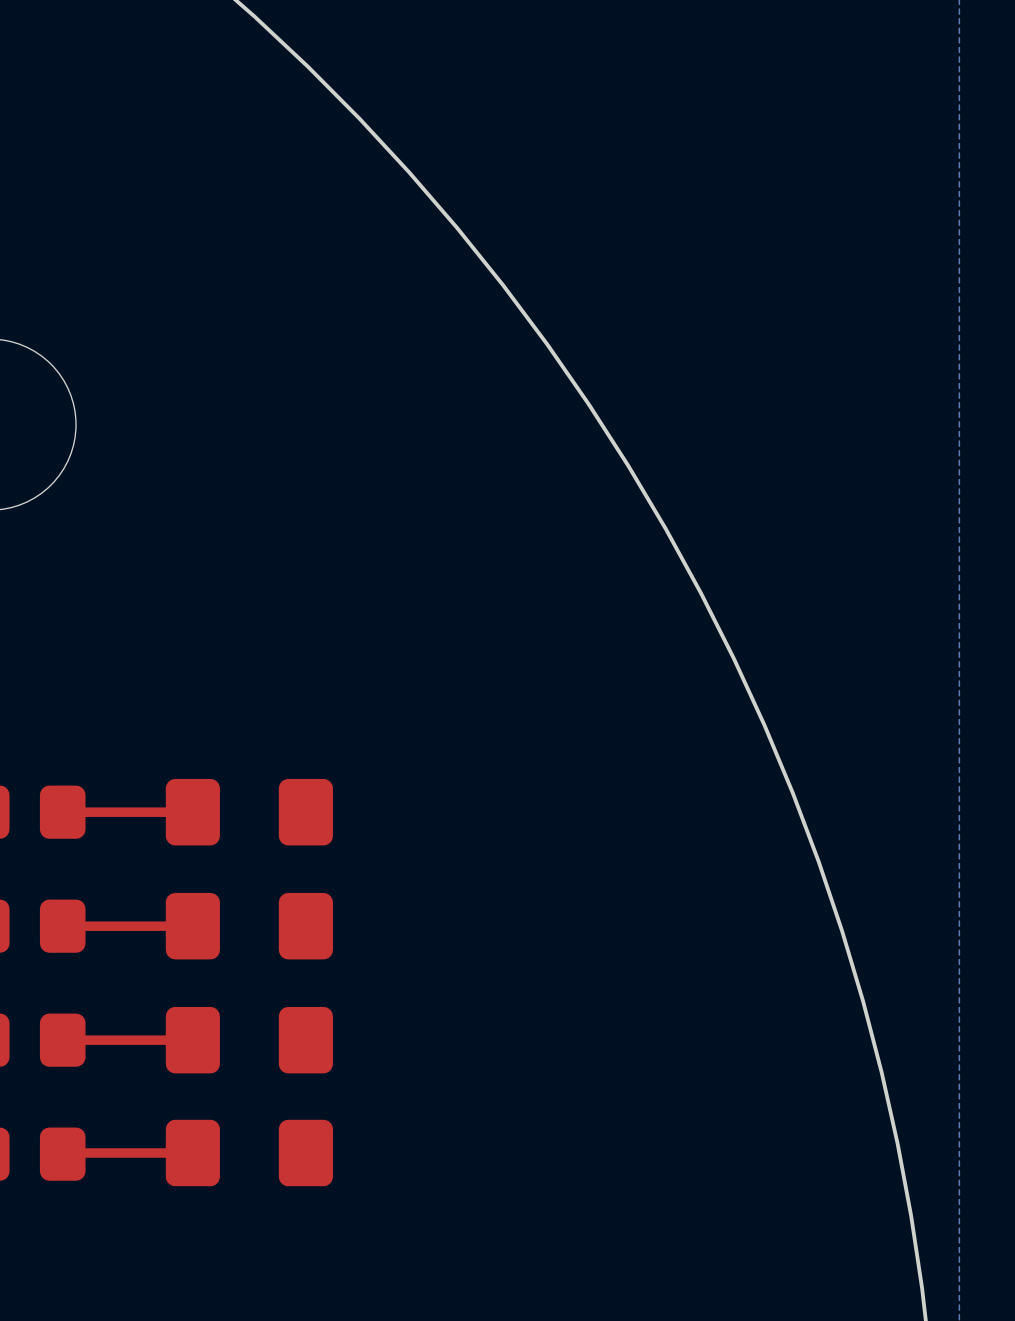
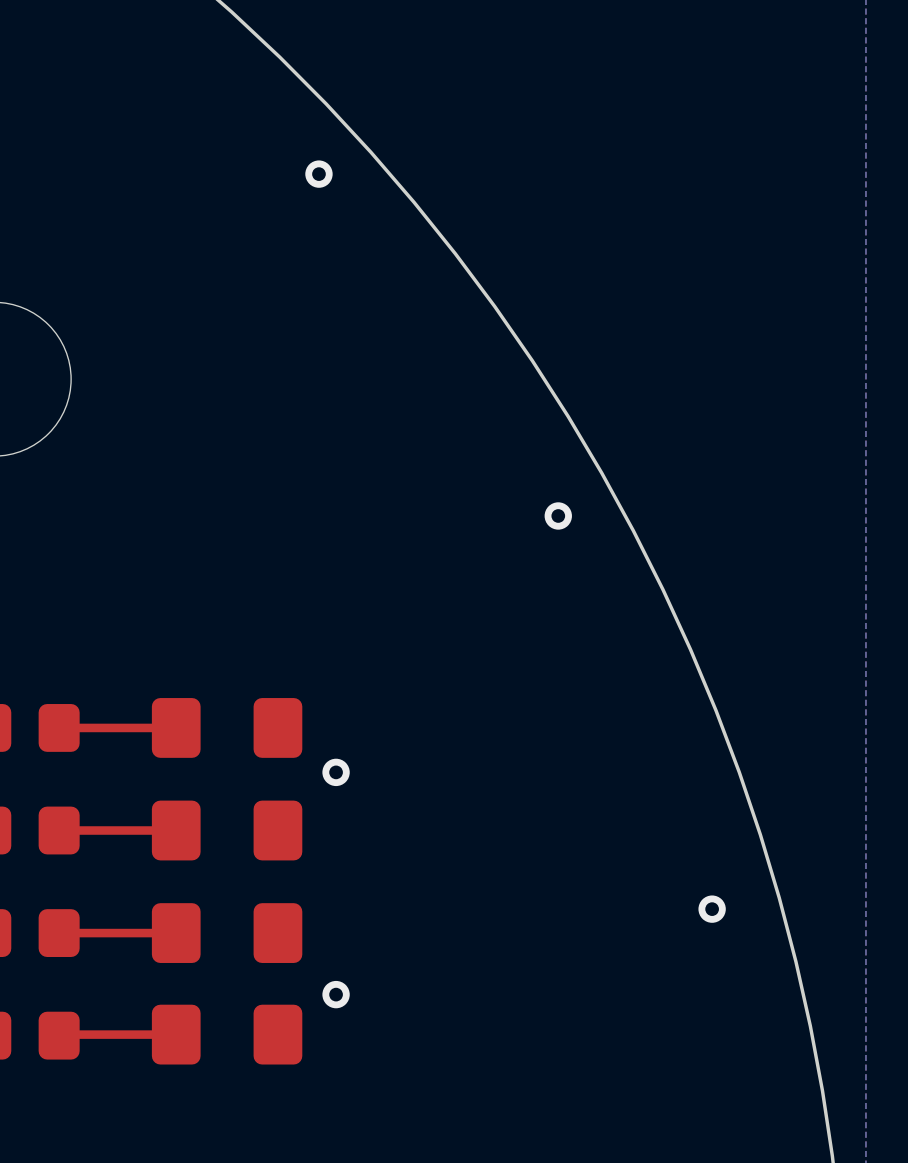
via: none -> (318, 174)
via: none -> (558, 515)
via: none -> (336, 772)
via: none -> (712, 909)
via: none -> (336, 994)

